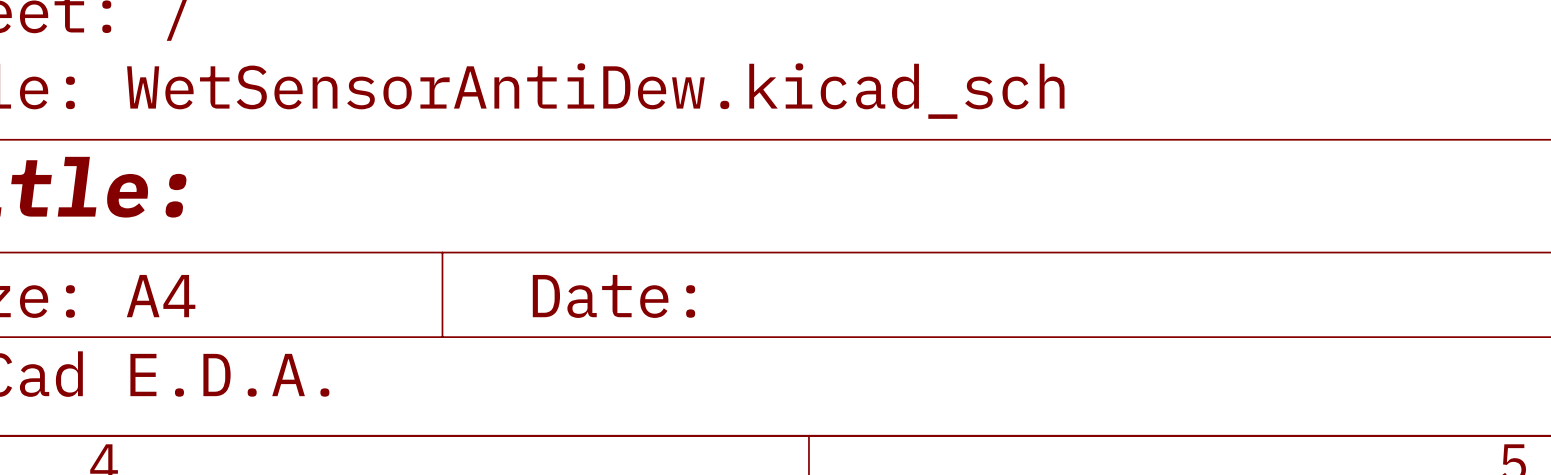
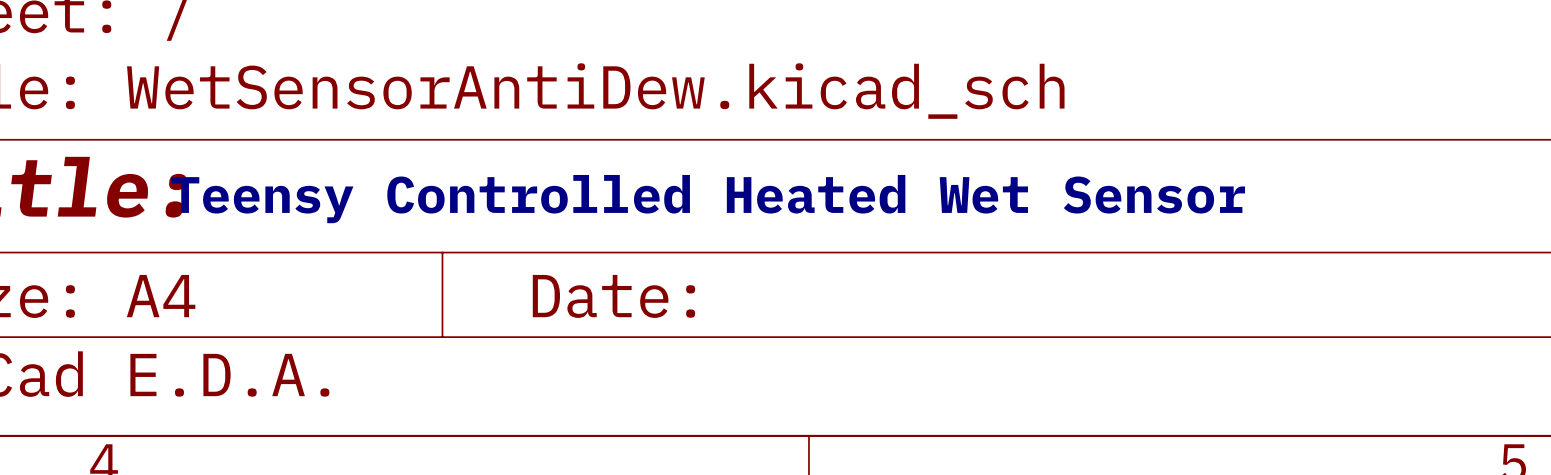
text: none -> Teensy Controlled Heated Wet Sensor (707, 199)

